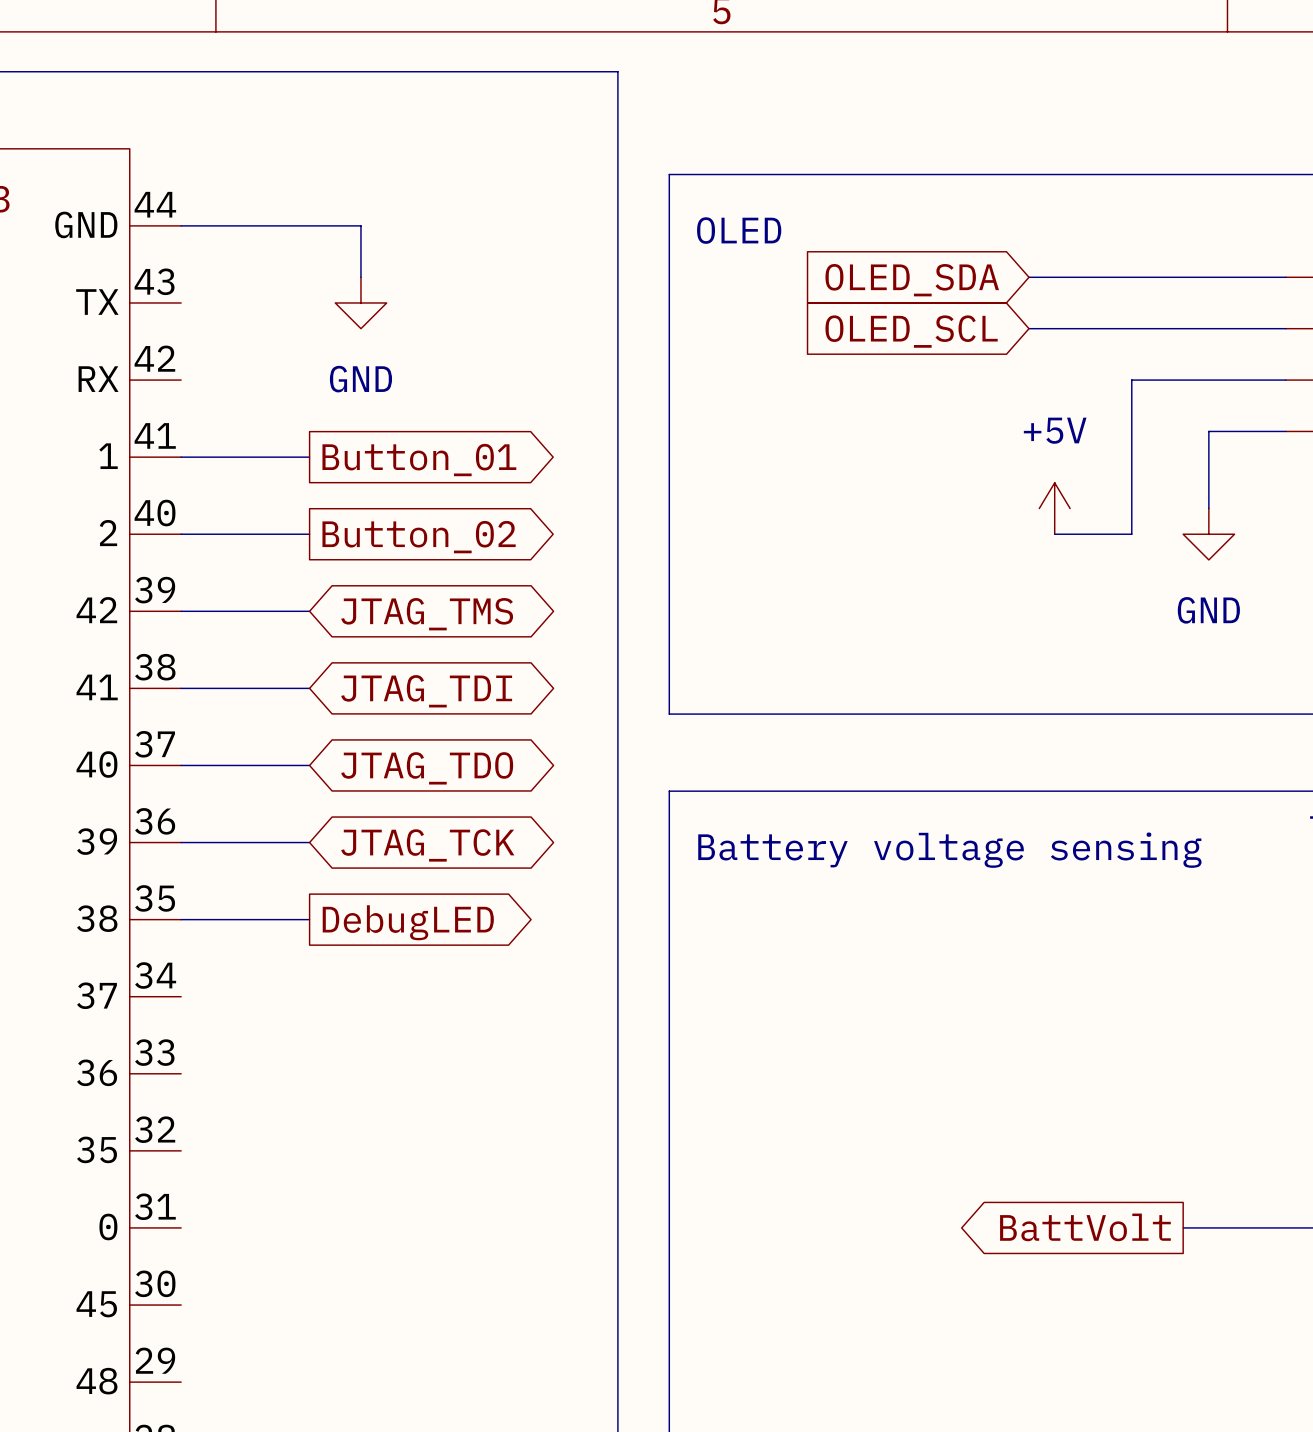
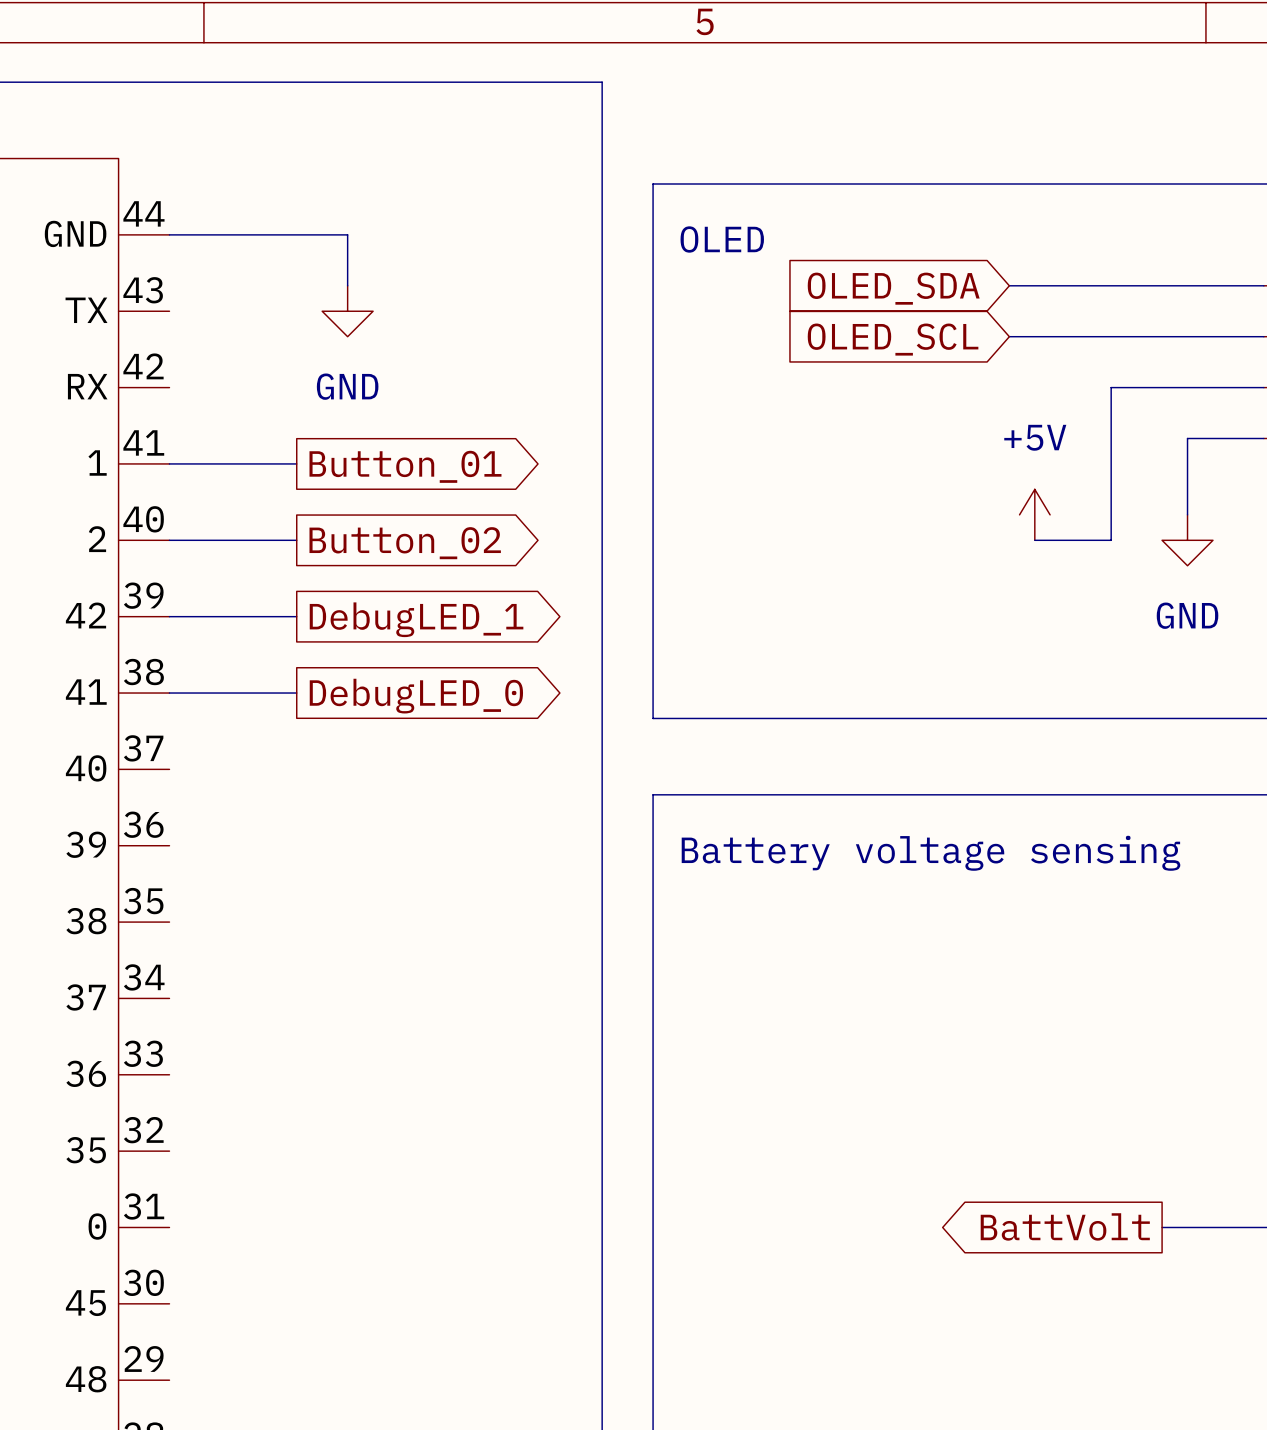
global label shape: bidirectional (427, 614) -> output (416, 619)
global label: JTAG_TMS (427, 614) -> DebugLED_1 (416, 619)
global label shape: bidirectional (426, 691) -> output (416, 696)
global label: JTAG_TDI (426, 691) -> DebugLED_0 (416, 696)
wire: (181, 765) (309, 765) -> none
global label: JTAG_TDO (427, 768) -> none
wire: (181, 842) (309, 842) -> none
global label: JTAG_TCK (427, 845) -> none
wire: (181, 919) (309, 919) -> none
global label: DebugLED (408, 922) -> none

